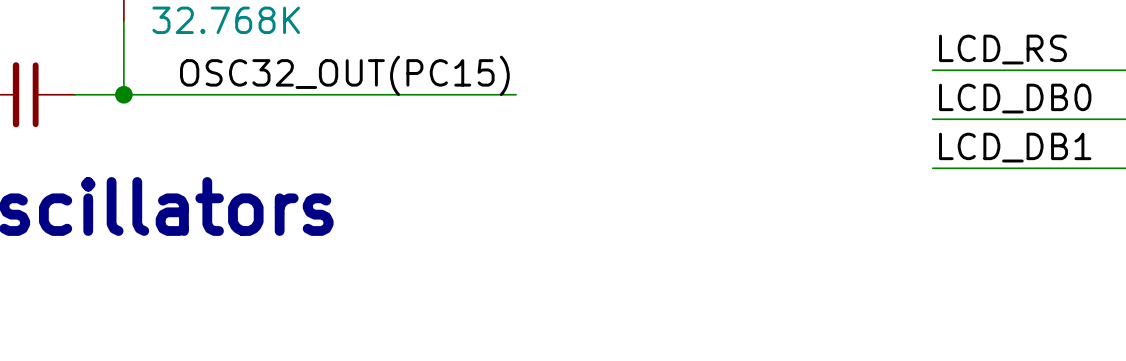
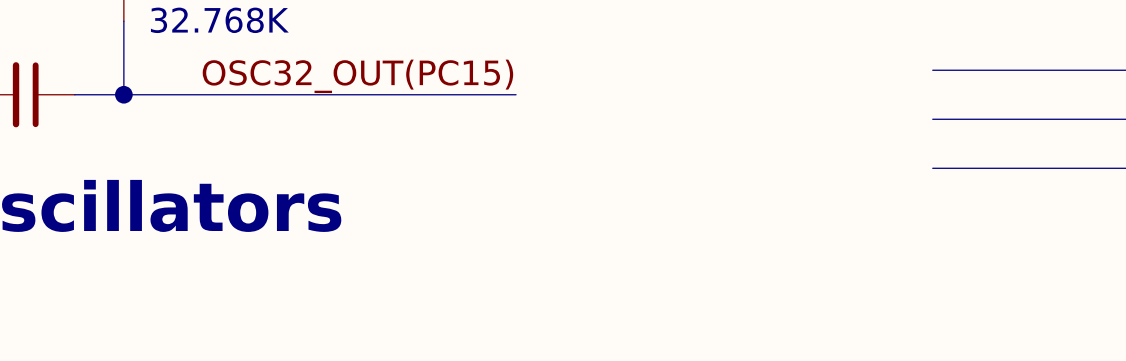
label: LCD_RS (1002, 49) -> none
label: LCD_DB0 (1015, 98) -> none
label: LCD_DB1 (1015, 147) -> none

